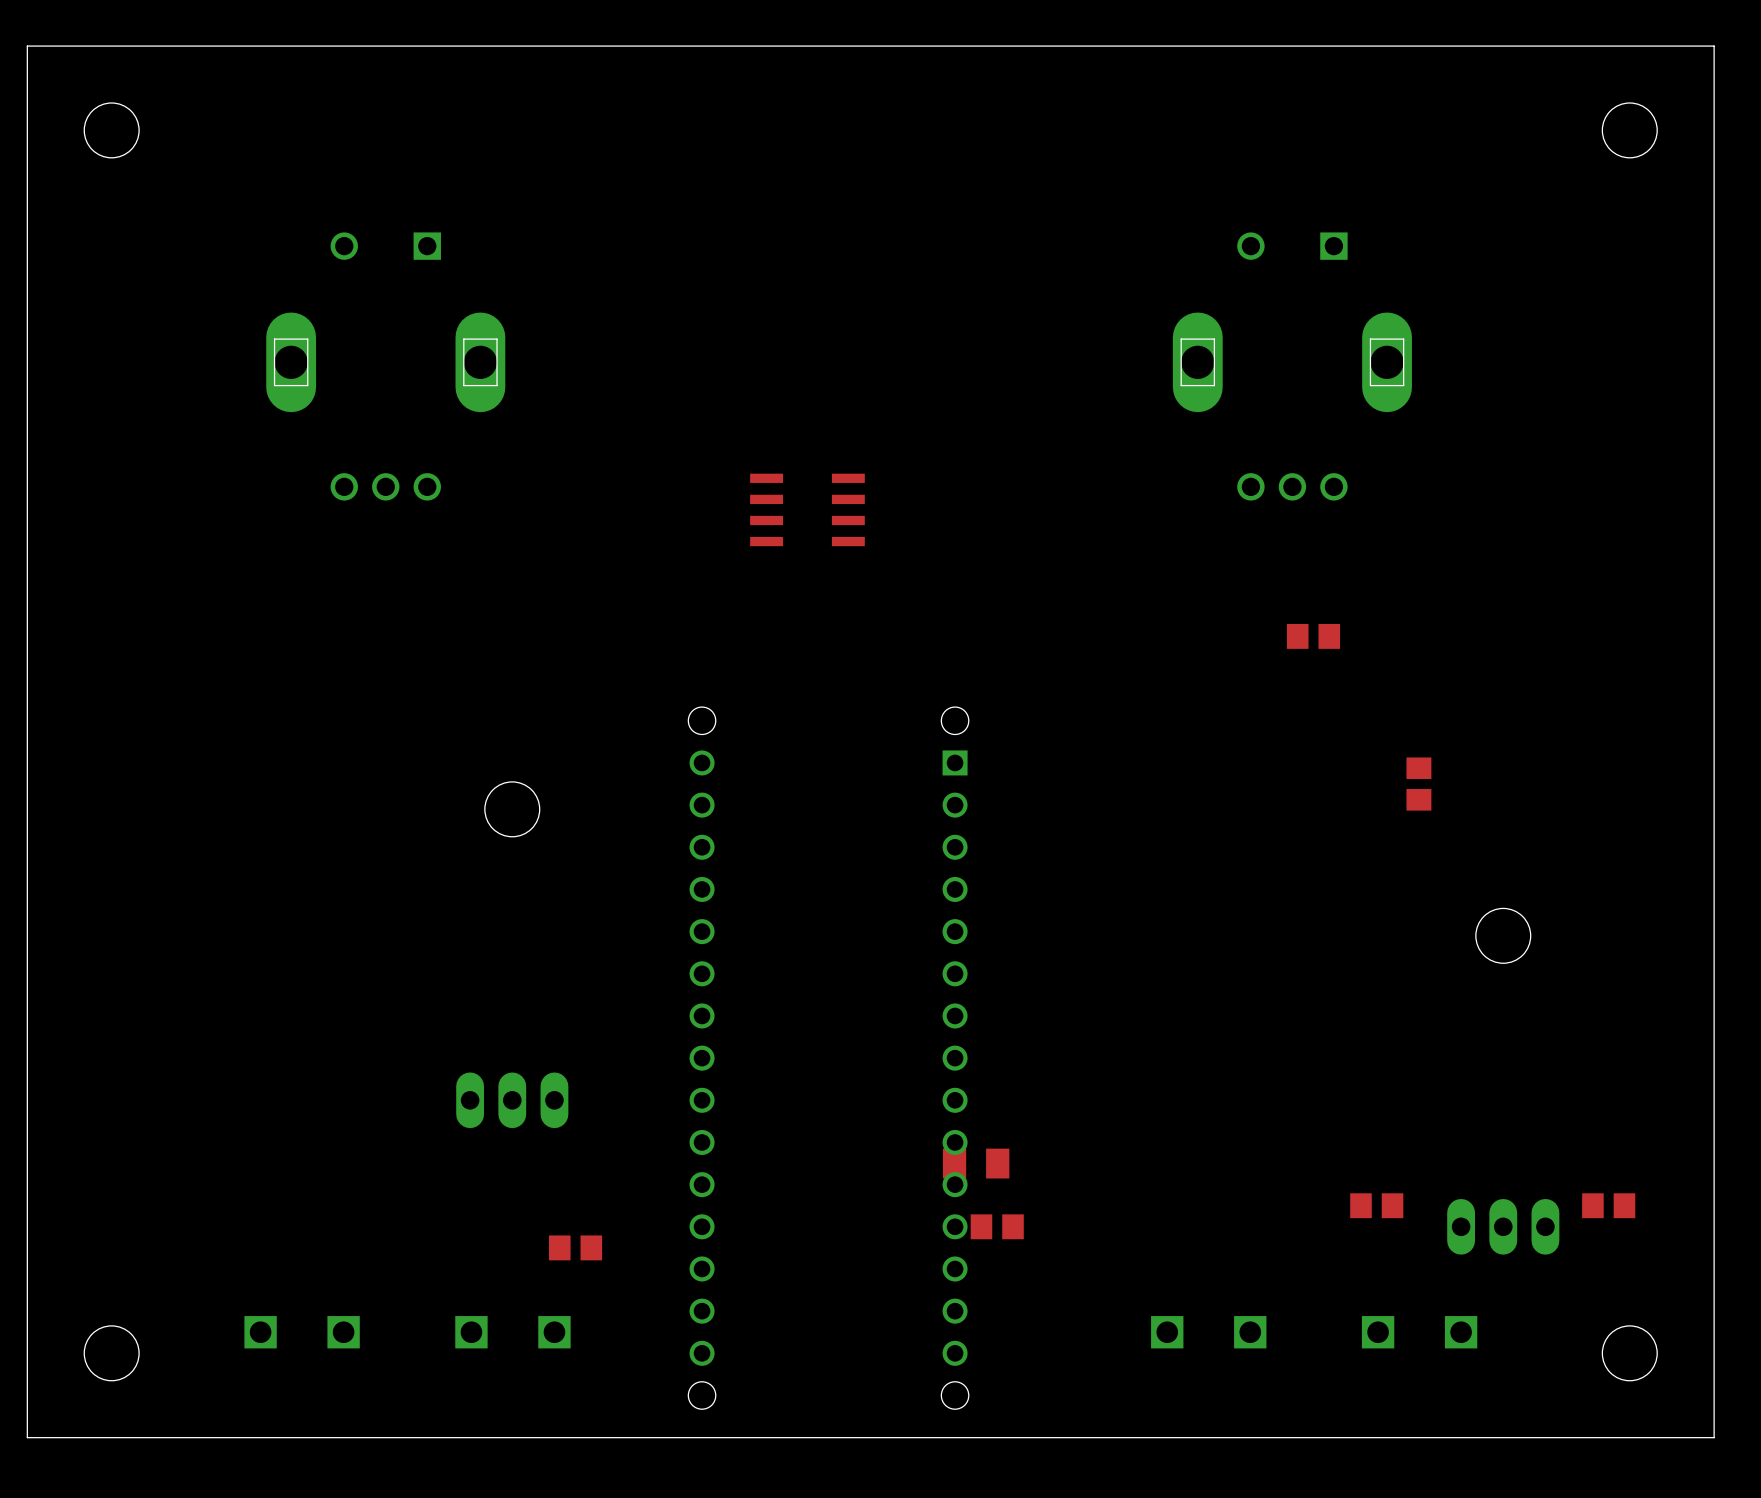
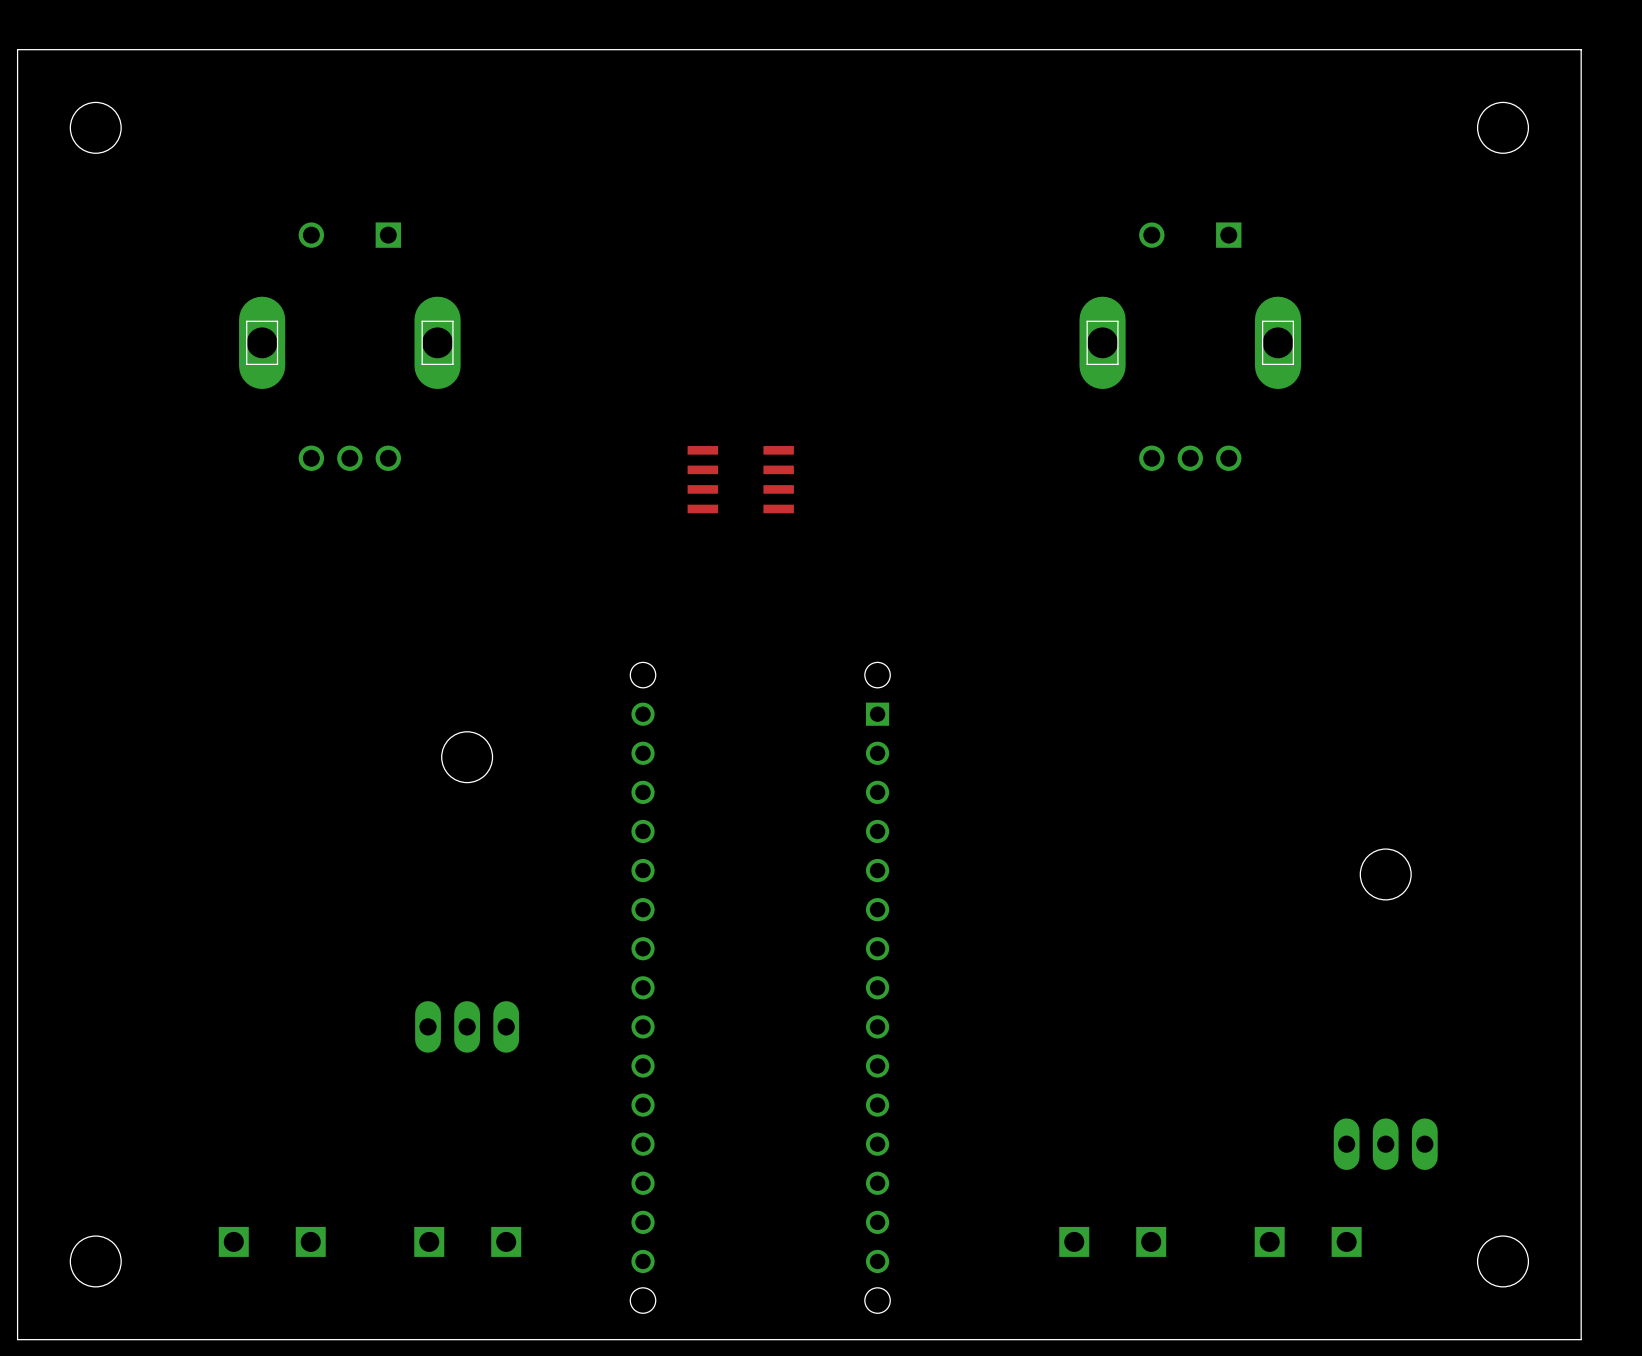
part: (1313, 636) -> none
part: (1418, 784) -> none
part: (976, 1163) -> none
part: (1376, 1205) -> none
part: (1608, 1205) -> none
part: (997, 1226) -> none
part: (575, 1247) -> none

